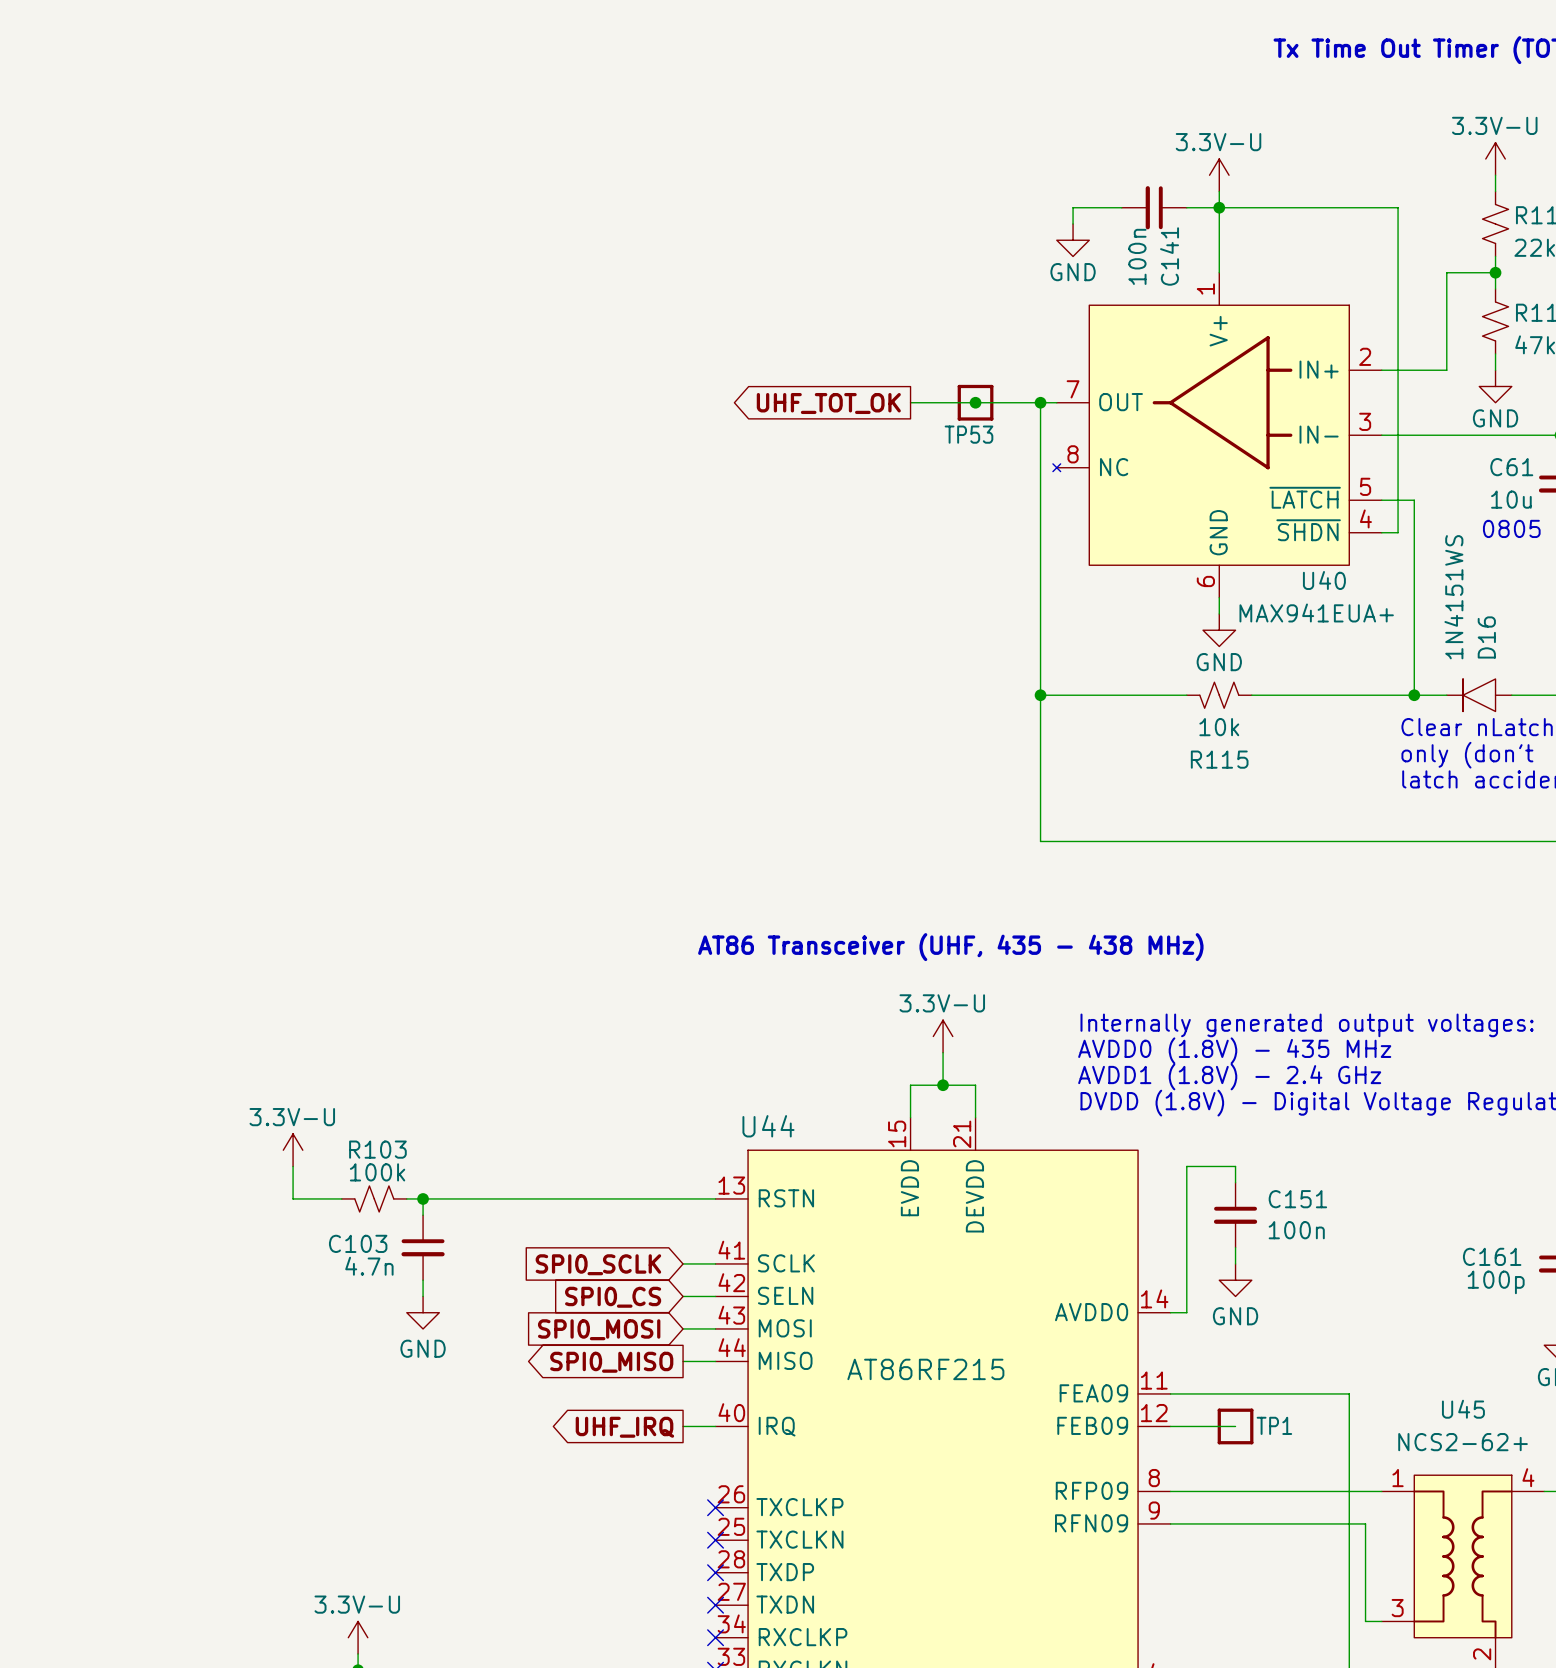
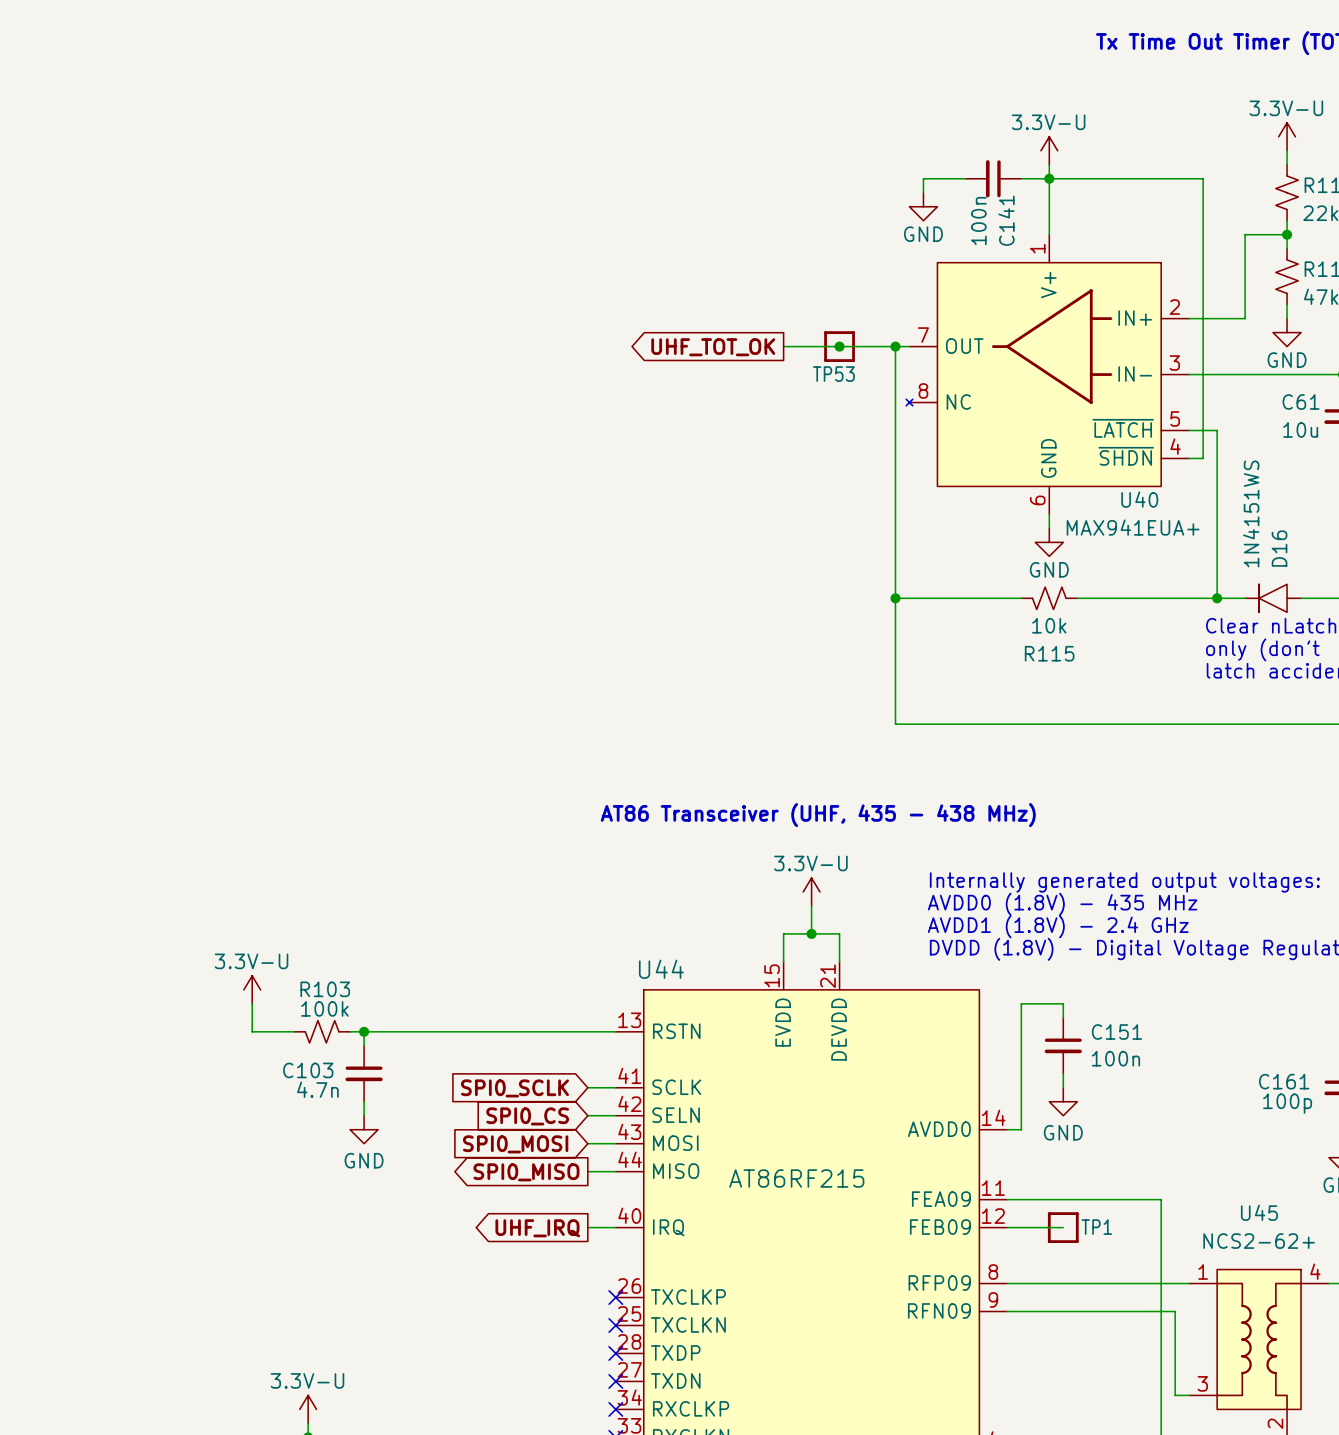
text: 0805 (1511, 528) -> none

